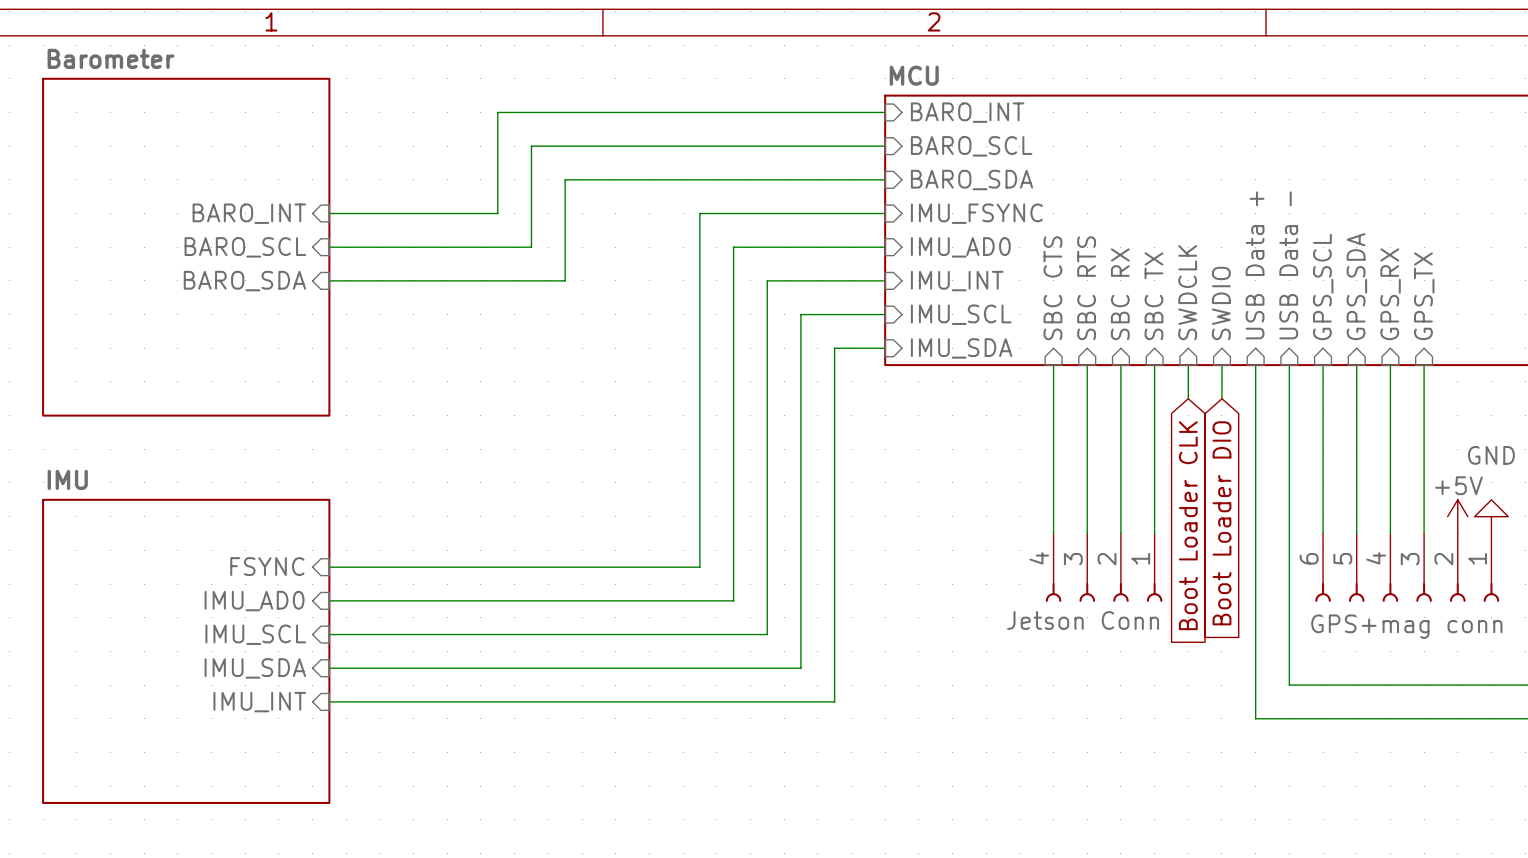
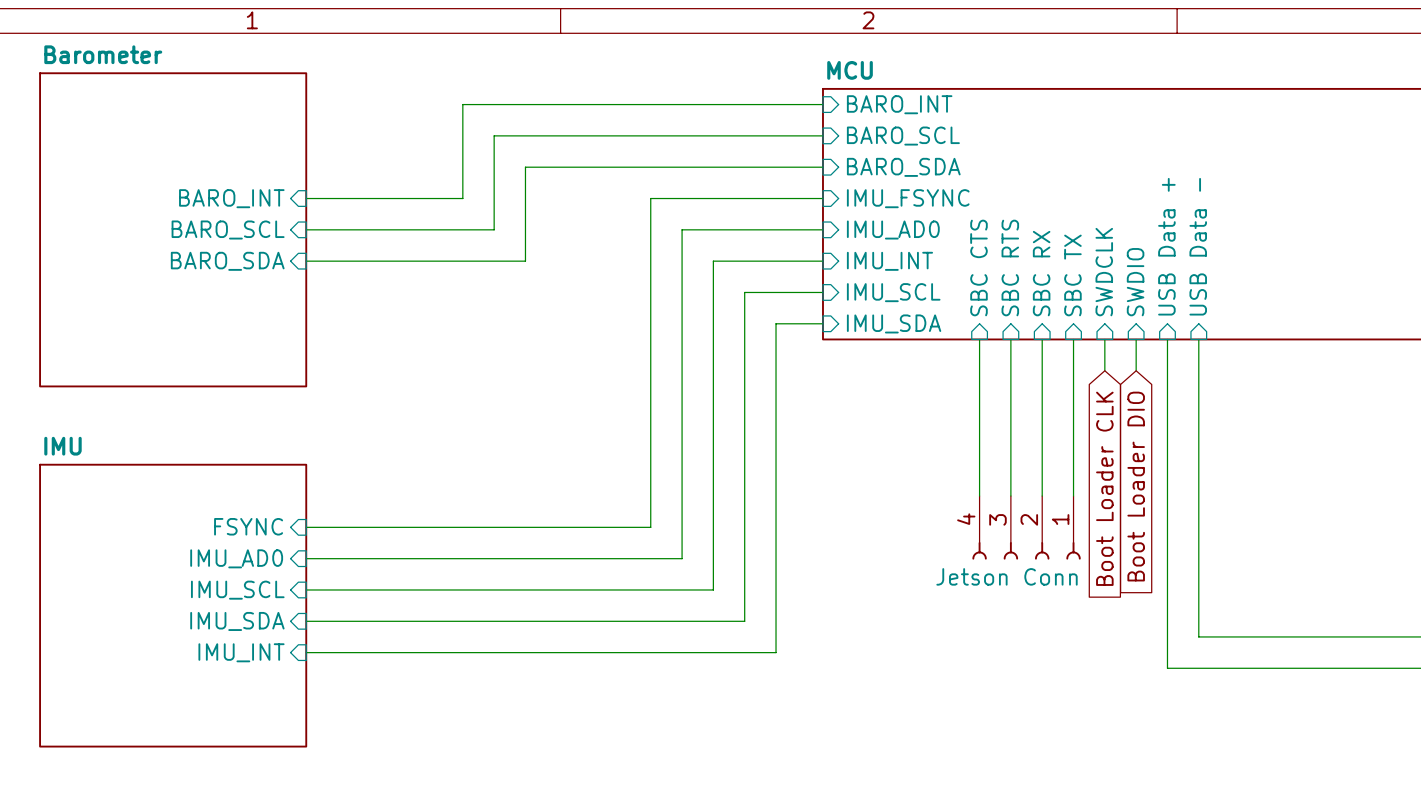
sheet pin: GPS_SDA (1356, 286) -> none
sheet pin: GPS_SCL (1323, 287) -> none
sheet pin: GPS_RX (1390, 294) -> none
sheet pin: GPS_TX (1424, 296) -> none
wire: (1323, 365) (1323, 533) -> none
wire: (1356, 365) (1356, 533) -> none
wire: (1390, 365) (1390, 533) -> none
wire: (1424, 365) (1424, 533) -> none
power symbol: +5V (1457, 516) -> none
power symbol: GND (1491, 516) -> none
part: GPS+mag conn (1407, 567) -> none

